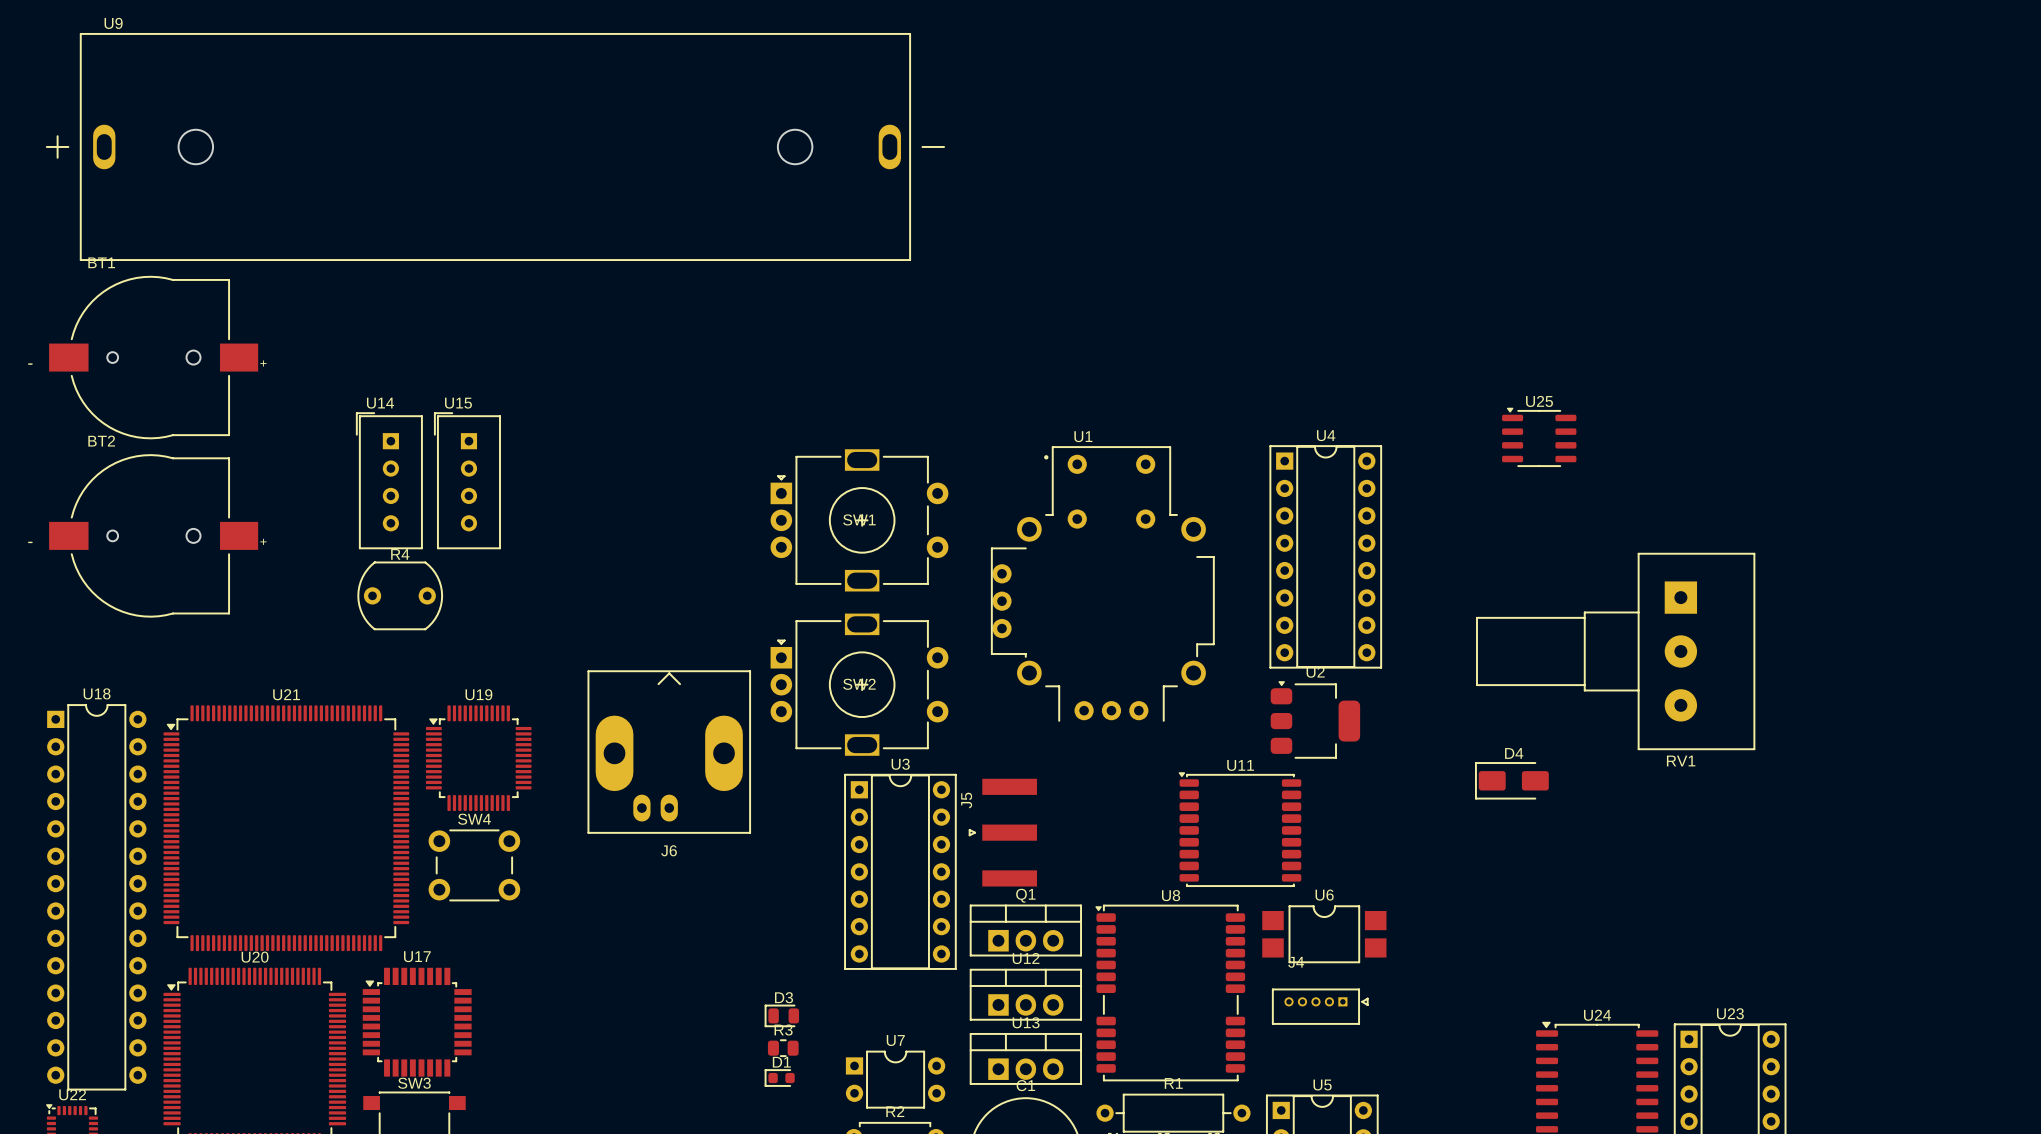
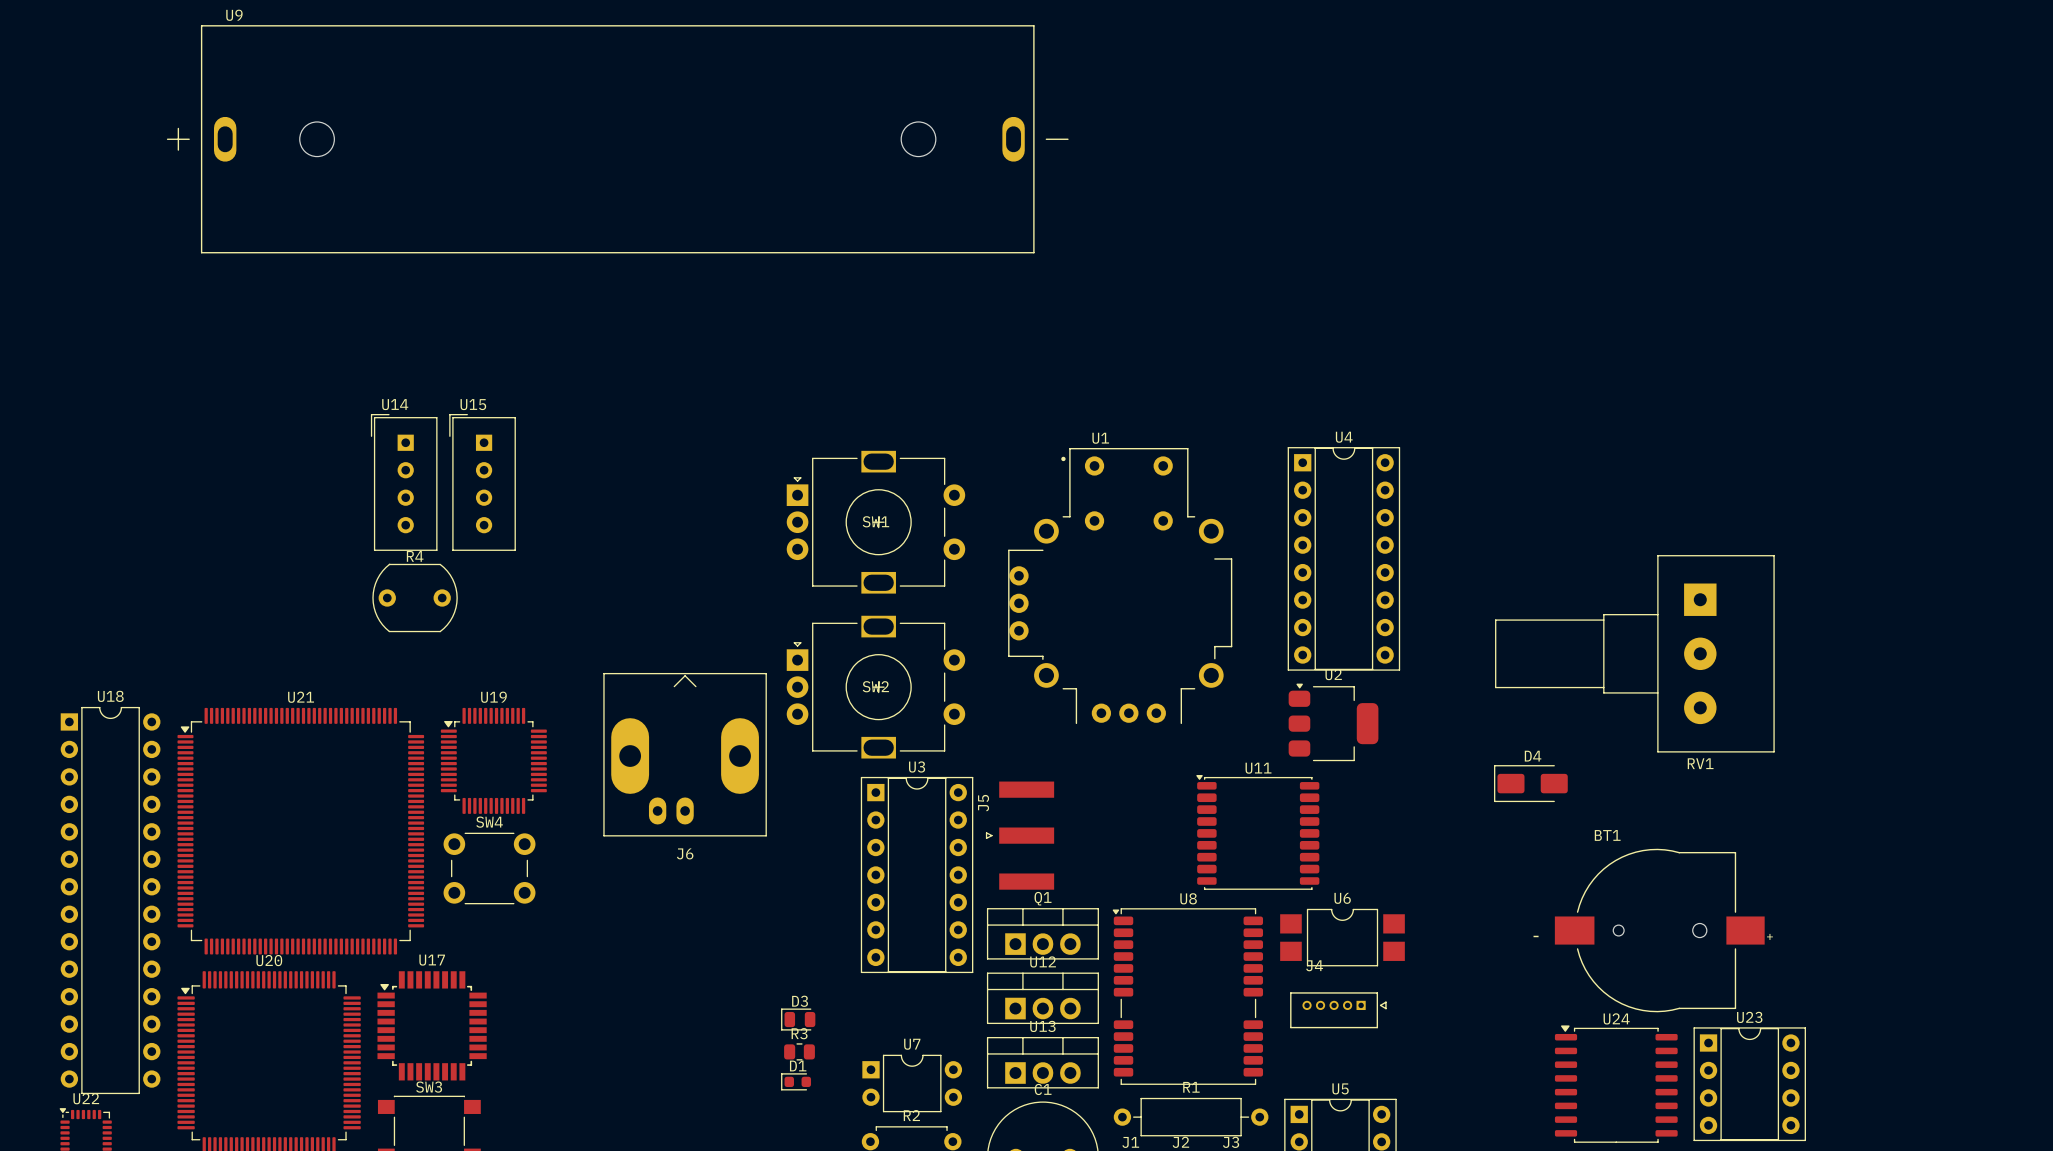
U9 position: (495, 146) -> (617, 139)
BT1 position: (153, 357) -> (1659, 930)
U25: (1539, 437) -> none
BT2: (153, 535) -> none

